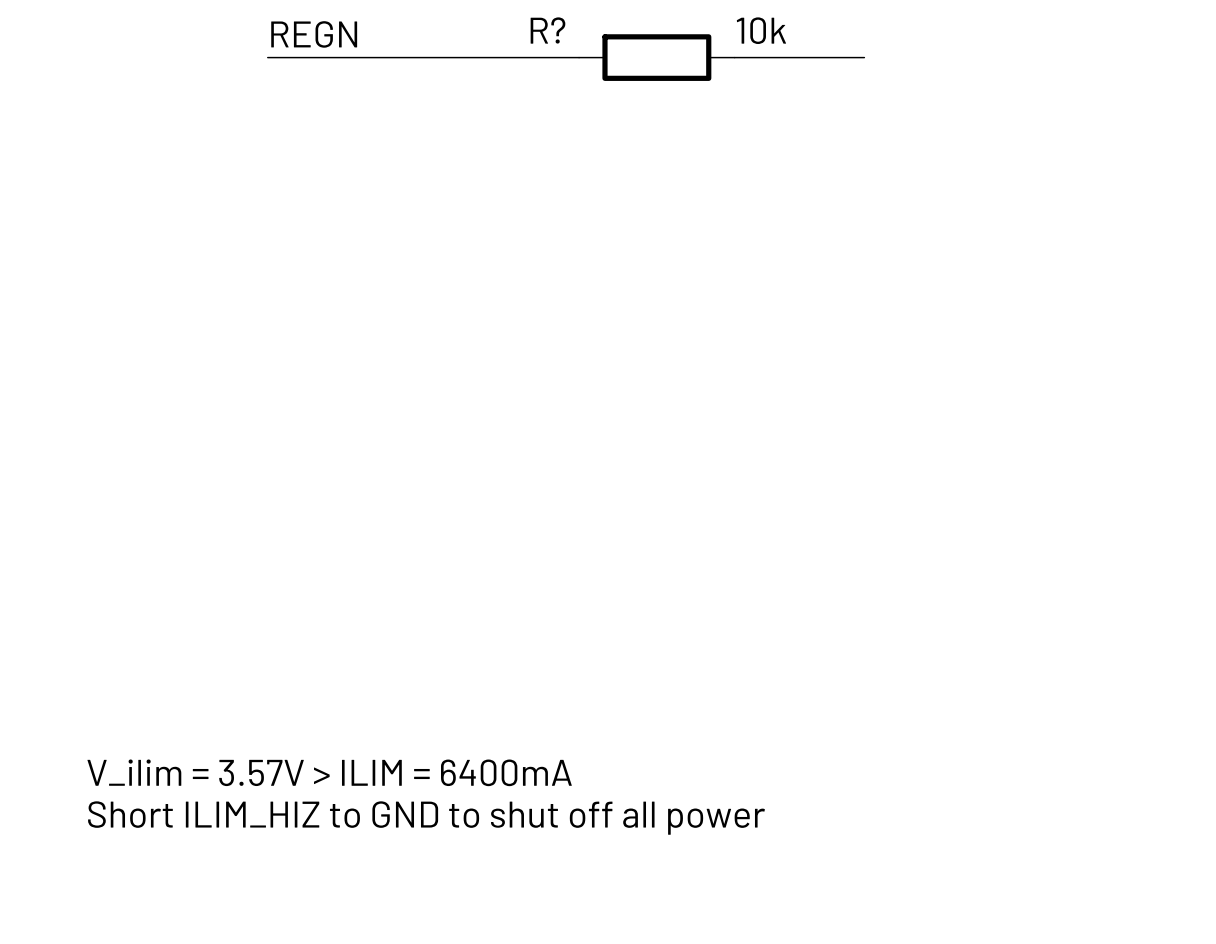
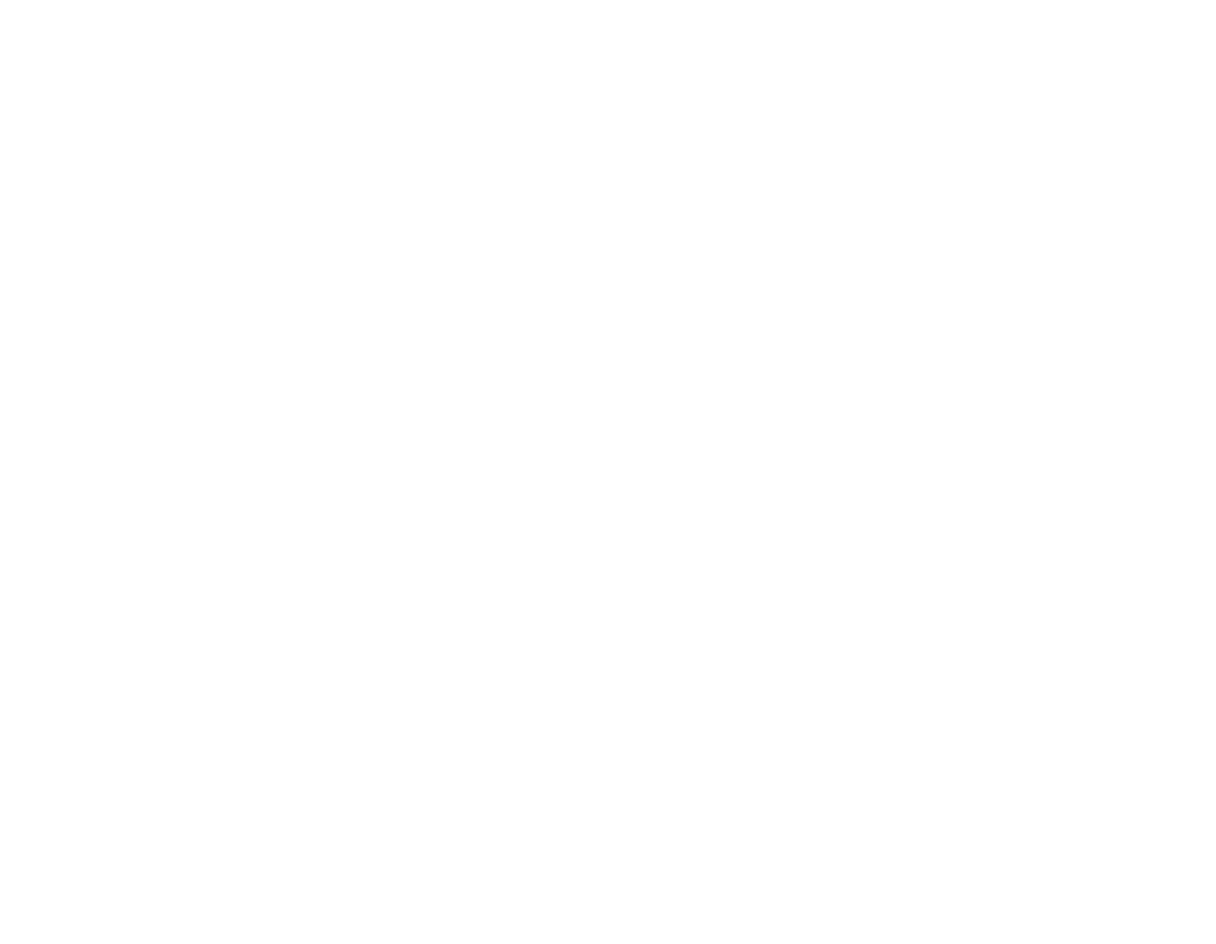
label: REGN (314, 34) -> none
wire: (267, 57) (579, 57) -> none
R?: 10k (656, 57) -> none
wire: (734, 57) (864, 57) -> none
text: V_ilim = 3.57V > ILIM = 6400mA (329, 772) -> none
text: Short ILIM_HIZ to GND to shut off all power (426, 818) -> none

